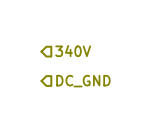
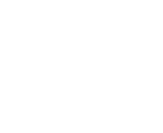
hierarchical label: 340V (73, 51) -> none
hierarchical label: DC_GND (83, 81) -> none

